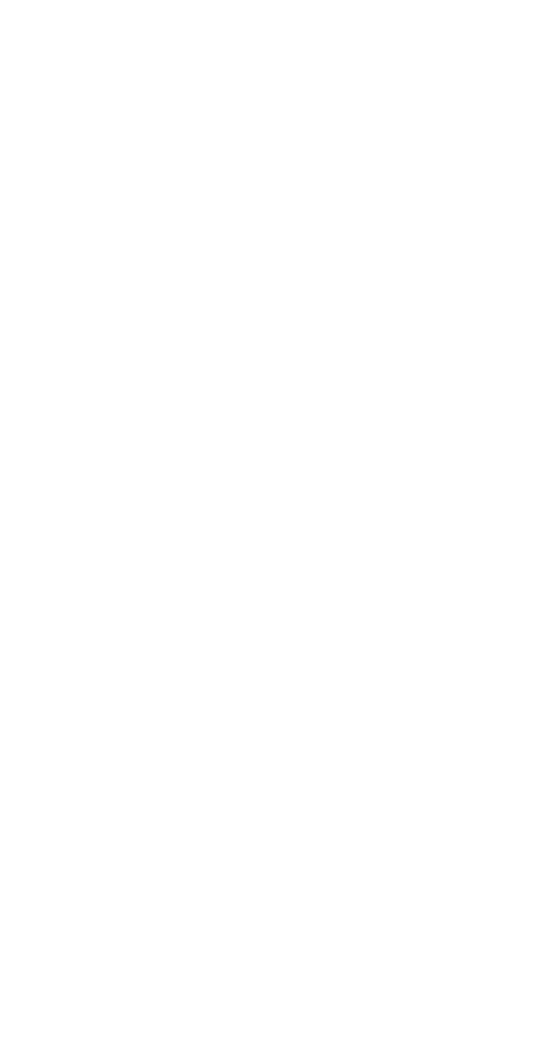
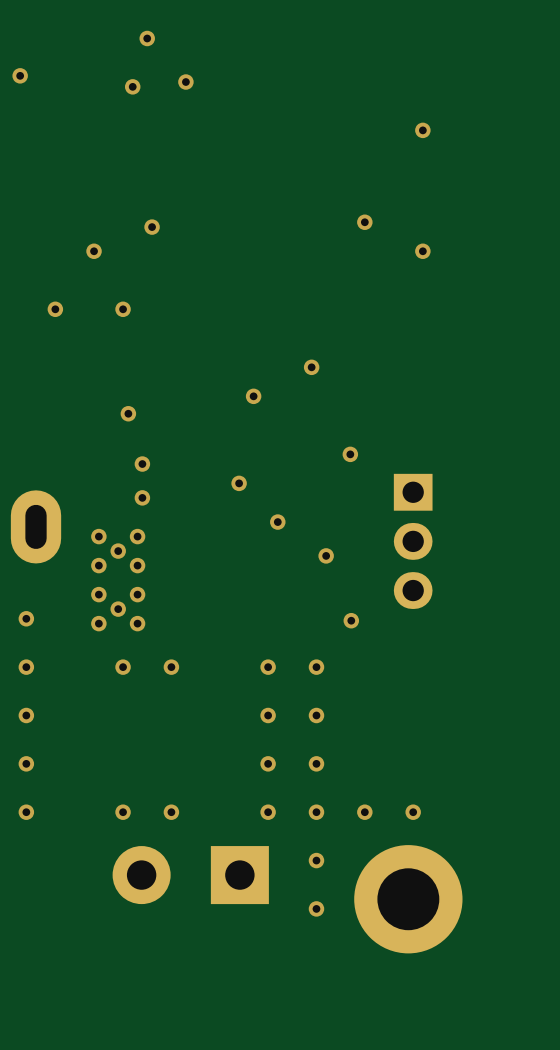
via: none -> (147, 38)
via: none -> (20, 75)
via: none -> (185, 82)
via: none -> (132, 86)
via: none -> (422, 130)
via: none -> (364, 222)
via: none -> (152, 227)
via: none -> (94, 251)
via: none -> (422, 251)
via: none -> (55, 309)
via: none -> (123, 309)
via: none -> (311, 367)
via: none -> (253, 396)
via: none -> (128, 413)
via: none -> (350, 454)
via: none -> (142, 464)
via: none -> (239, 483)
via: none -> (142, 497)
via: none -> (277, 522)
part: none -> (36, 526)
via: none -> (98, 536)
via: none -> (137, 536)
part: none -> (413, 541)
via: none -> (118, 551)
via: none -> (326, 555)
via: none -> (98, 565)
via: none -> (137, 565)
via: none -> (98, 594)
via: none -> (137, 594)
via: none -> (118, 609)
via: none -> (26, 618)
via: none -> (351, 620)
via: none -> (98, 623)
via: none -> (137, 623)
via: none -> (26, 667)
via: none -> (123, 667)
via: none -> (171, 667)
via: none -> (268, 667)
via: none -> (316, 667)
via: none -> (26, 715)
via: none -> (268, 715)
via: none -> (316, 715)
via: none -> (26, 763)
via: none -> (268, 763)
via: none -> (316, 763)
via: none -> (26, 812)
via: none -> (123, 812)
via: none -> (171, 812)
via: none -> (268, 812)
via: none -> (316, 812)
via: none -> (364, 812)
via: none -> (413, 812)
via: none -> (316, 860)
part: none -> (190, 875)
part: none -> (408, 899)
via: none -> (316, 908)

